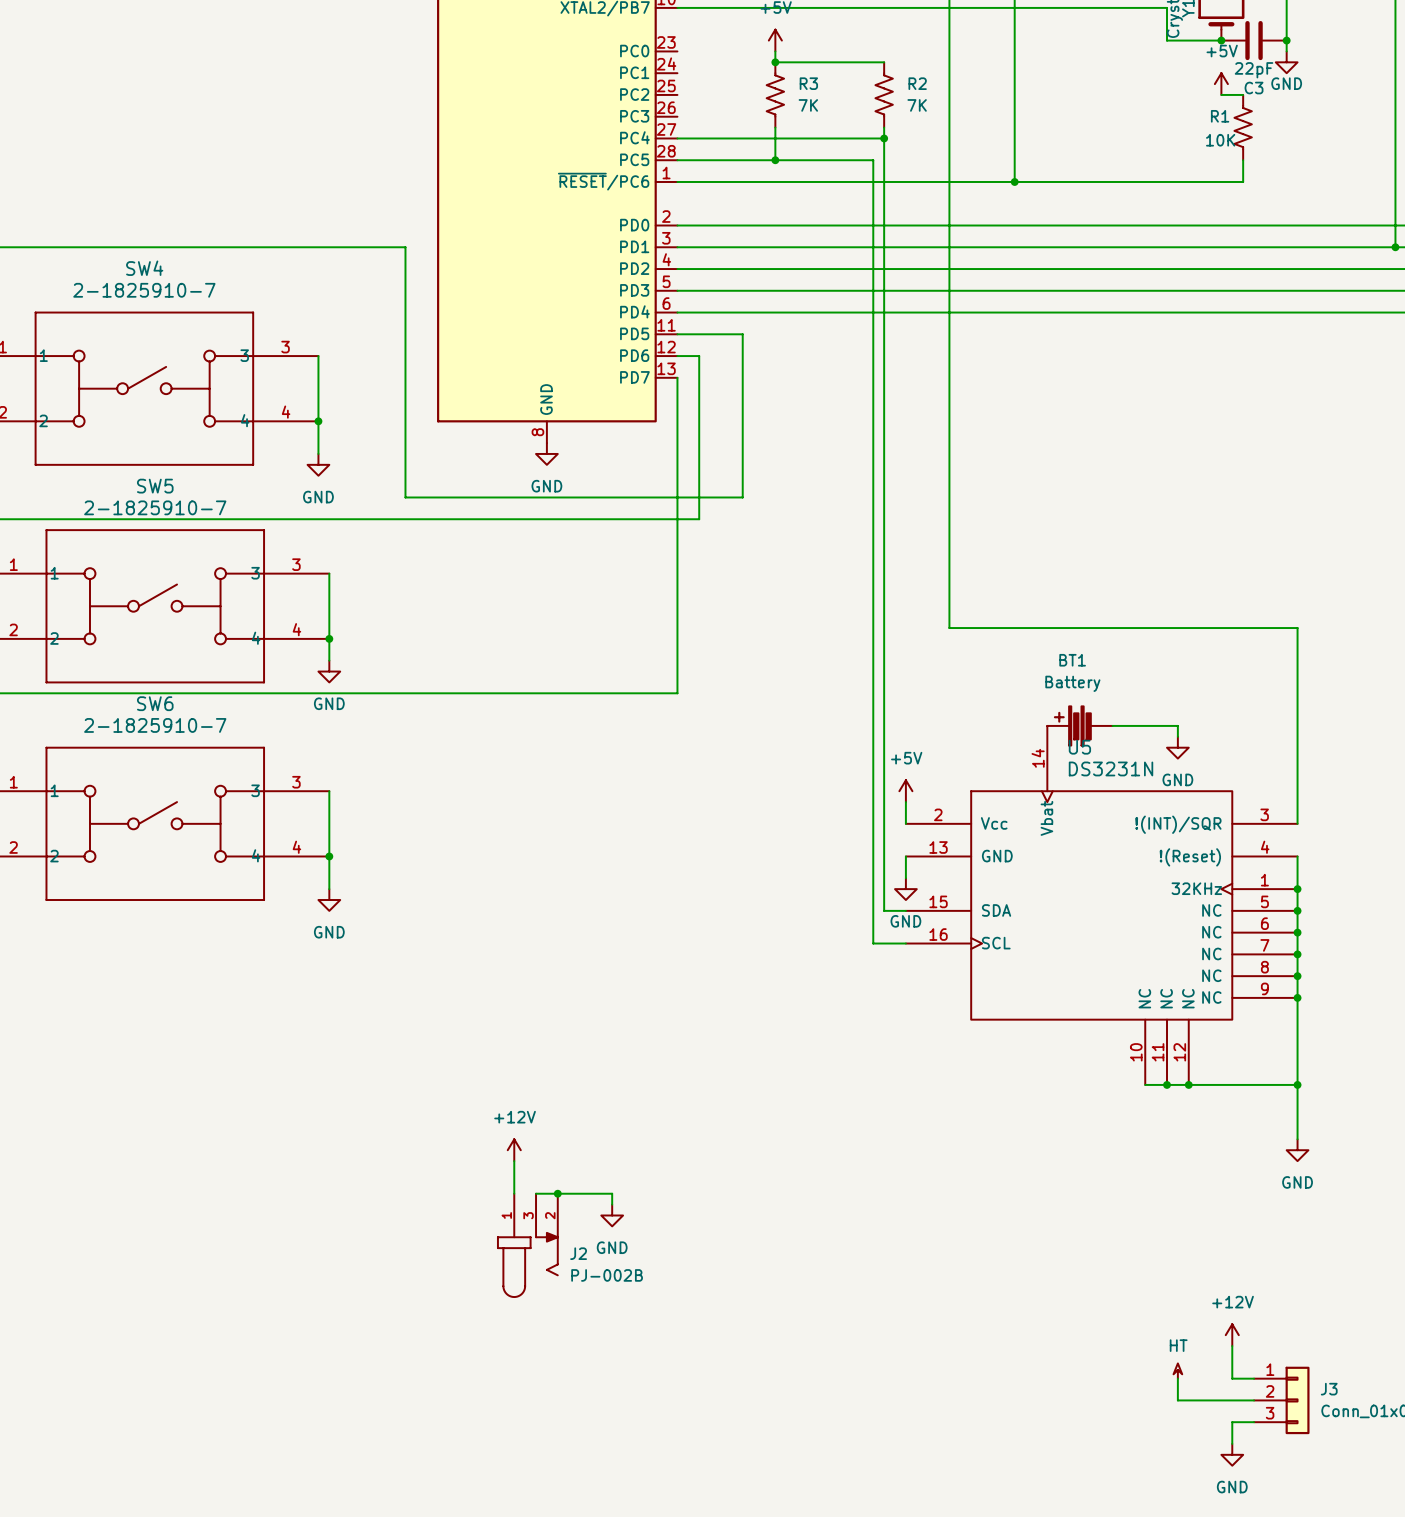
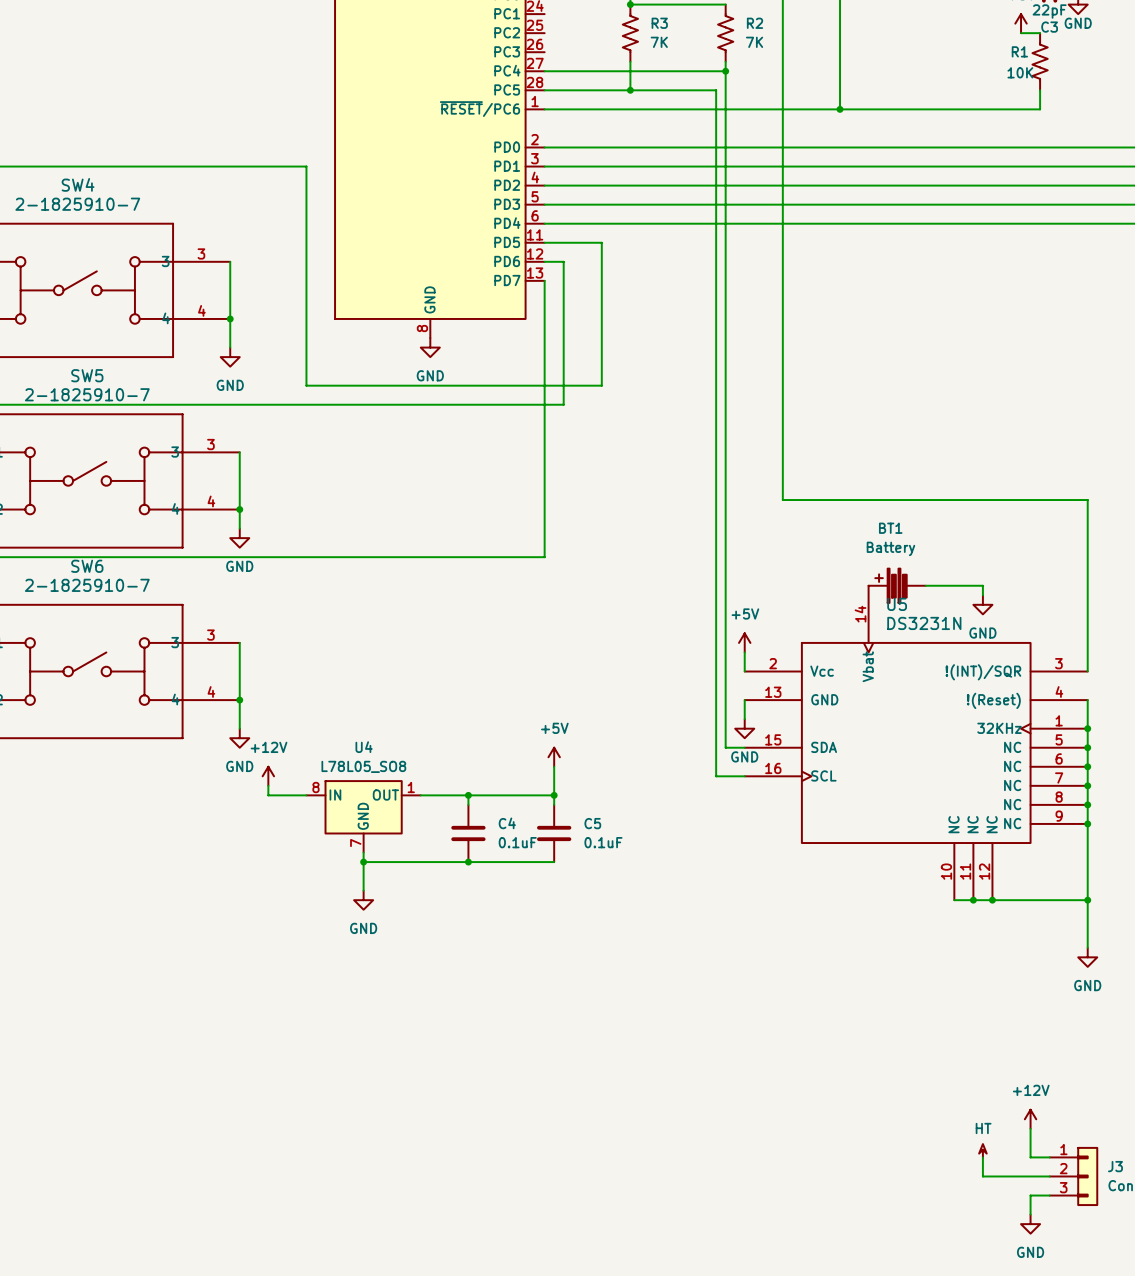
power symbol: none -> +5V (554, 757)
wire: none -> (554, 766) (554, 804)
power symbol: none -> +12V (268, 776)
wire: none -> (268, 785) (268, 795) (306, 795)
wire: none -> (420, 795) (554, 795)
wire: none -> (468, 795) (468, 804)
junction: none -> (468, 795)
junction: none -> (554, 795)
U4: none -> L78L05_SO8 (363, 816)
C4: none -> 0.1uF (468, 833)
C5: none -> 0.1uF (554, 833)
wire: none -> (363, 852) (363, 890)
wire: none -> (363, 862) (554, 862)
junction: none -> (363, 862)
junction: none -> (468, 862)
power symbol: +12V (514, 1150) -> none
wire: (514, 1161) (514, 1193) -> none
wire: (536, 1193) (612, 1193) (612, 1204) -> none
junction: (557, 1193) -> none
power symbol position: GND (612, 1215) -> GND (363, 900)
J2: PJ-002B (527, 1245) -> none

